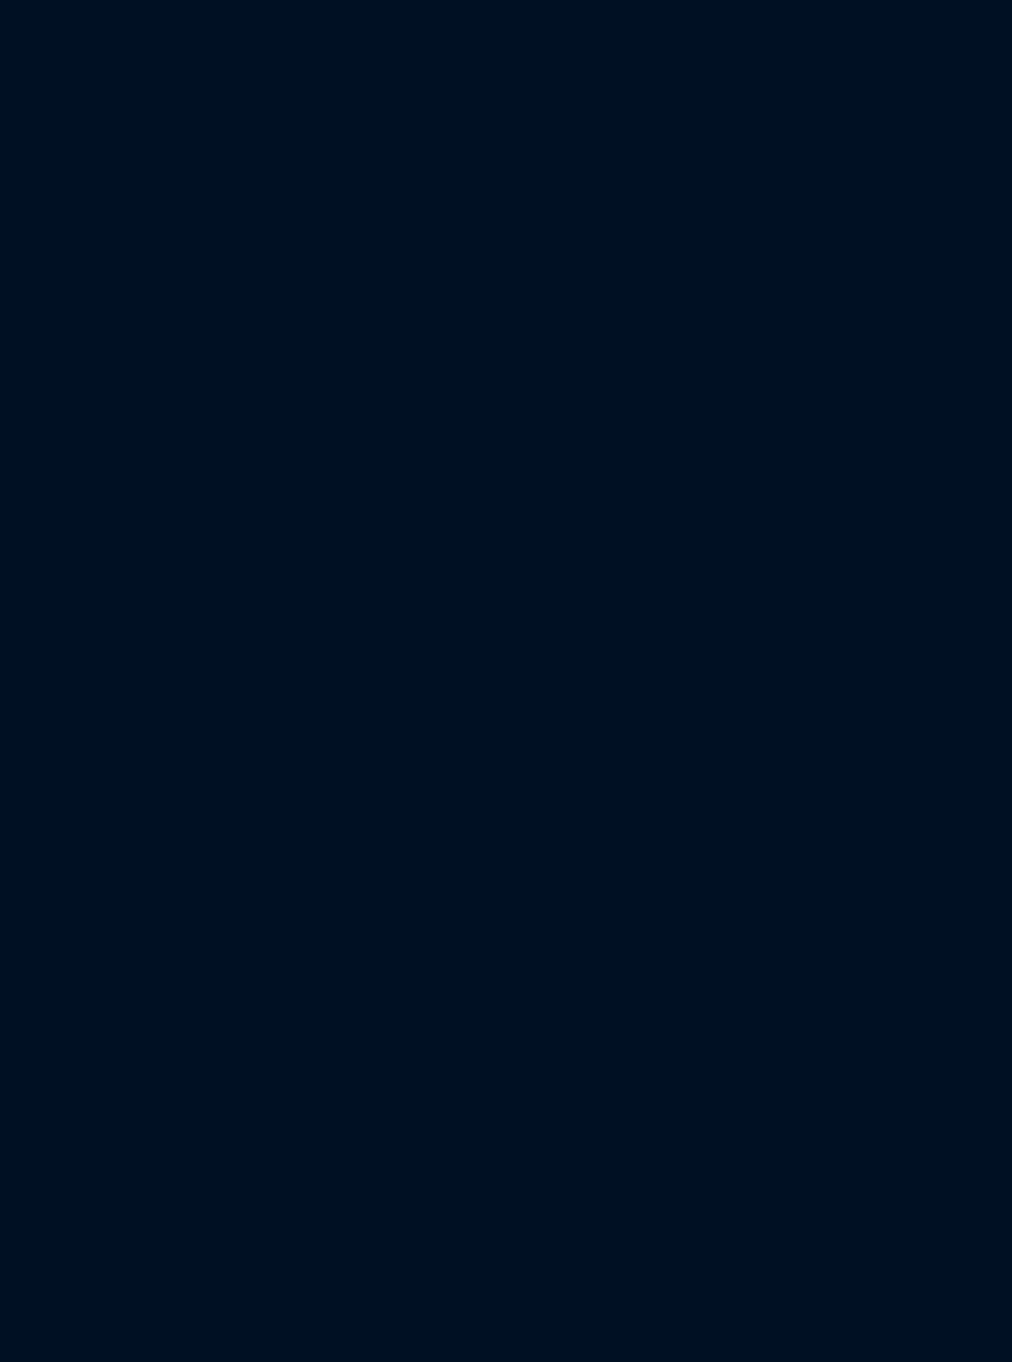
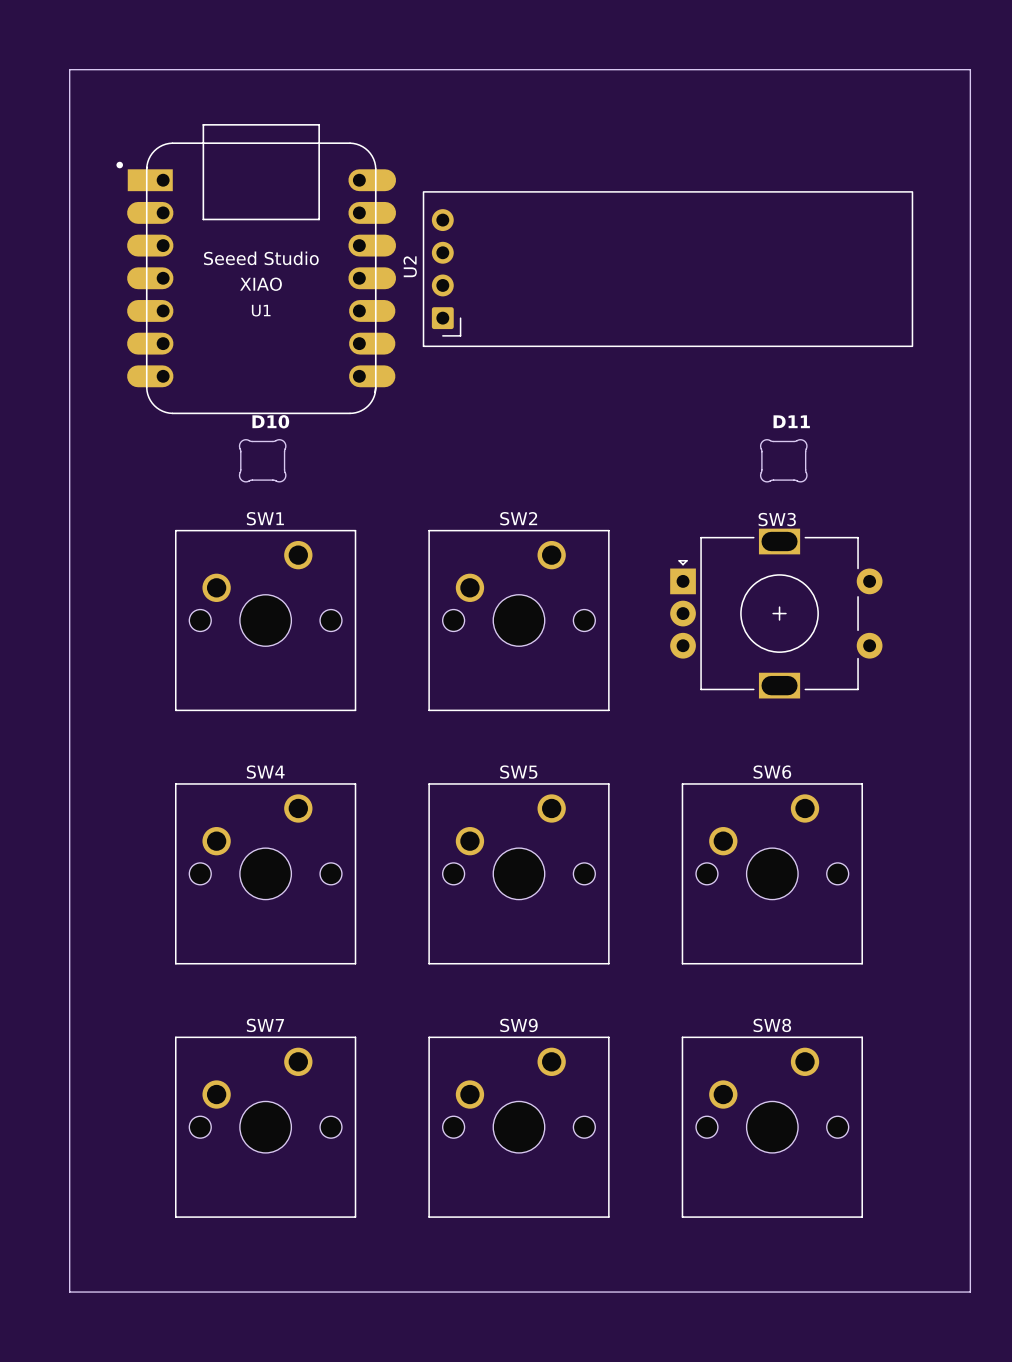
board edge: none -> (69, 69) (970, 69) (970, 1292) (69, 1292) (69, 69)
U1: none -> (256, 269)
U2: none -> (667, 269)
D10: none -> (262, 460)
D11: none -> (783, 460)
SW3: none -> (776, 613)
SW1: none -> (265, 620)
SW2: none -> (518, 620)
SW4: none -> (265, 873)
SW5: none -> (518, 873)
SW6: none -> (772, 873)
SW7: none -> (265, 1127)
SW9: none -> (518, 1127)
SW8: none -> (772, 1127)

